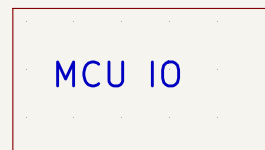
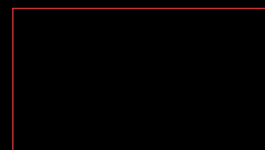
text: MCU IO (118, 73) -> none

